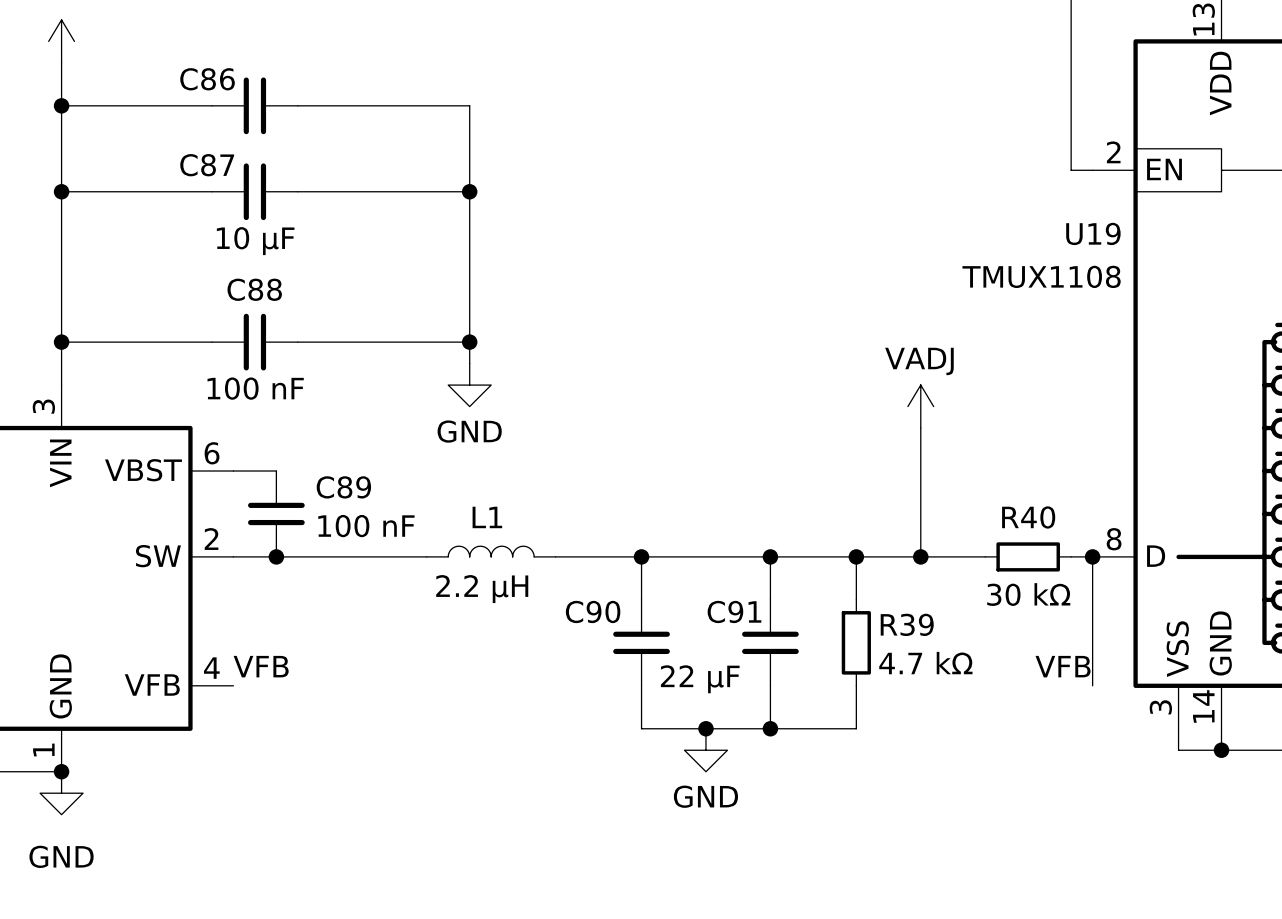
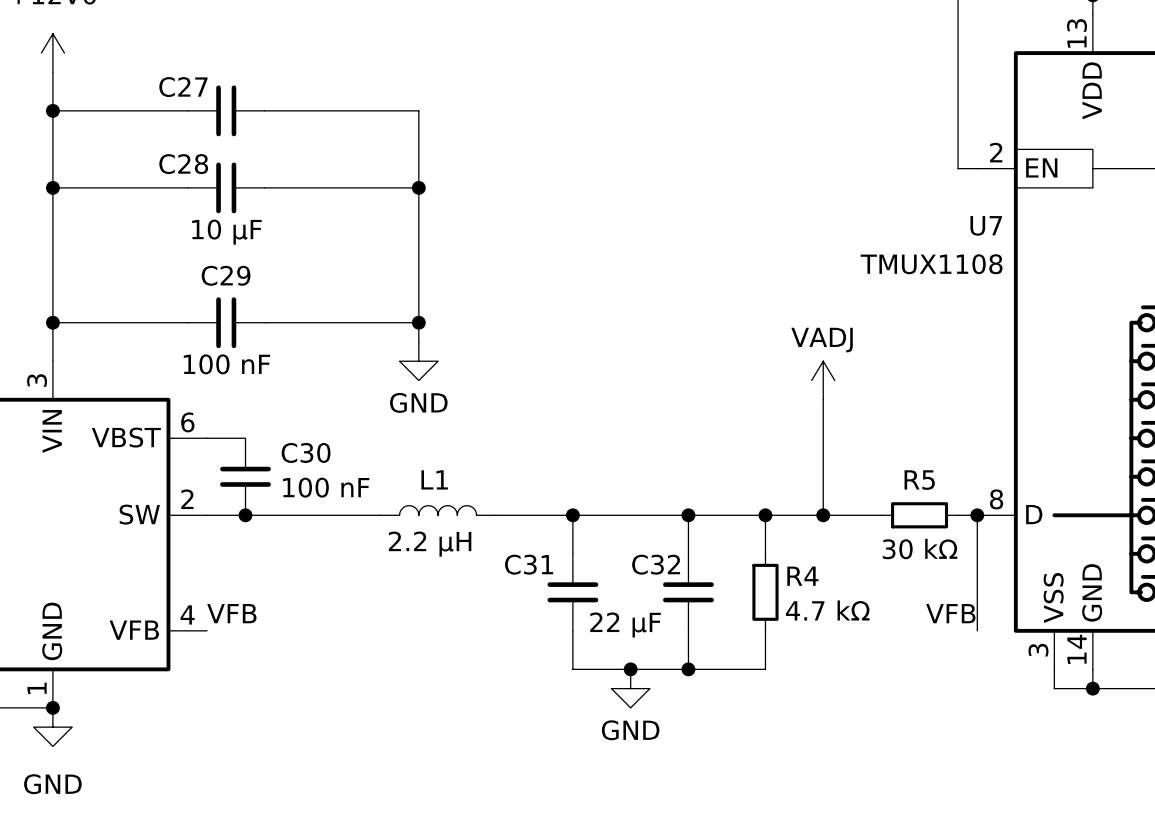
C86 name: C86 (207, 79) -> C27 (183, 87)
C87 name: C87 (207, 165) -> C28 (183, 164)
U19 name: U19 (1093, 233) -> U7 (986, 225)
C88 name: C88 (254, 289) -> C29 (226, 275)
C89 name: C89 (343, 487) -> C30 (306, 452)
R40 name: R40 (1028, 517) -> R5 (919, 480)
C90 name: C90 (593, 611) -> C31 (529, 564)
C91 name: C91 (734, 611) -> C32 (656, 564)
R39 name: R39 (907, 624) -> R4 (802, 576)

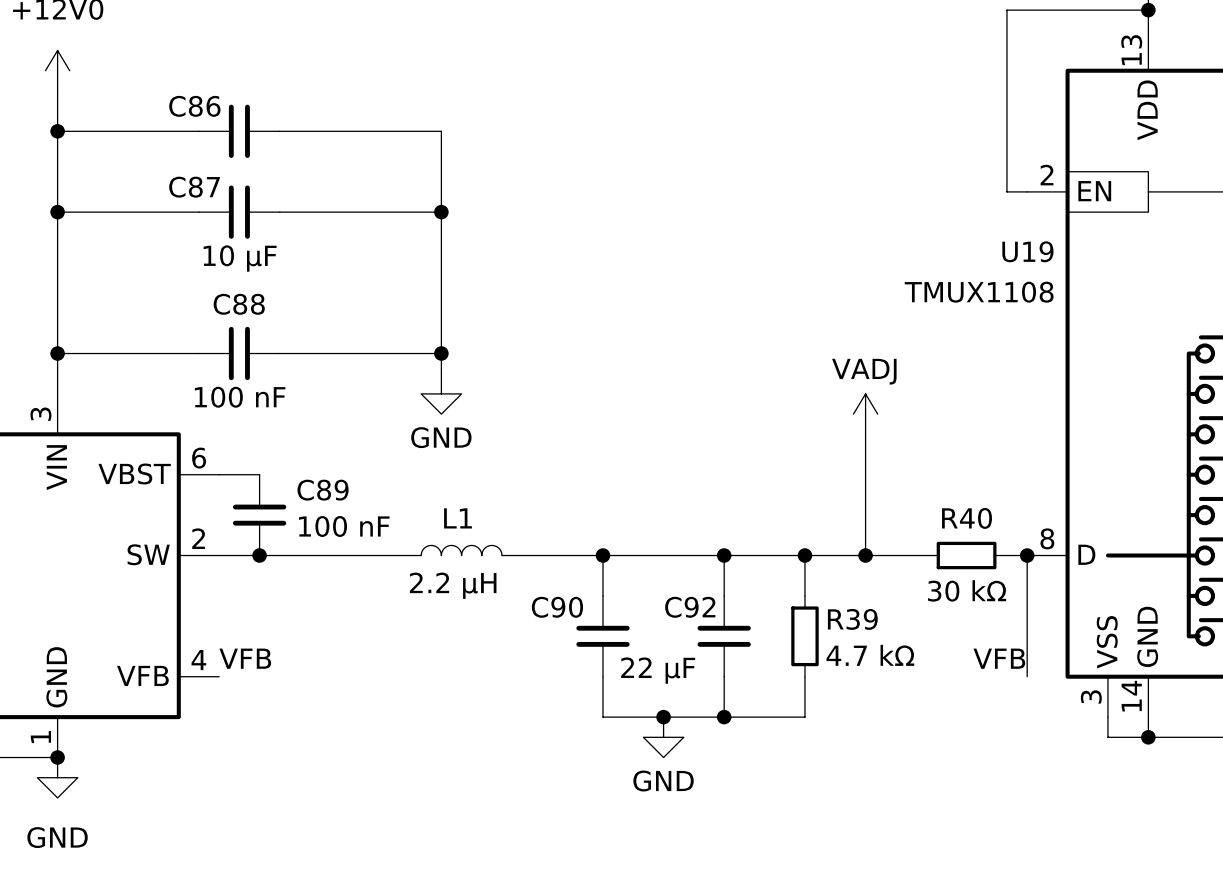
C27 name: C27 (183, 87) -> C86 (194, 106)
C28 name: C28 (183, 164) -> C87 (194, 187)
U7 name: U7 (986, 225) -> U19 (1027, 251)
C29 name: C29 (226, 275) -> C88 (239, 304)
C30 name: C30 (306, 452) -> C89 (323, 490)
R5 name: R5 (919, 480) -> R40 (967, 518)
C31 name: C31 (529, 564) -> C90 (557, 607)
C32 name: C32 (656, 564) -> C92 (690, 607)
R4 name: R4 (802, 576) -> R39 (852, 619)

